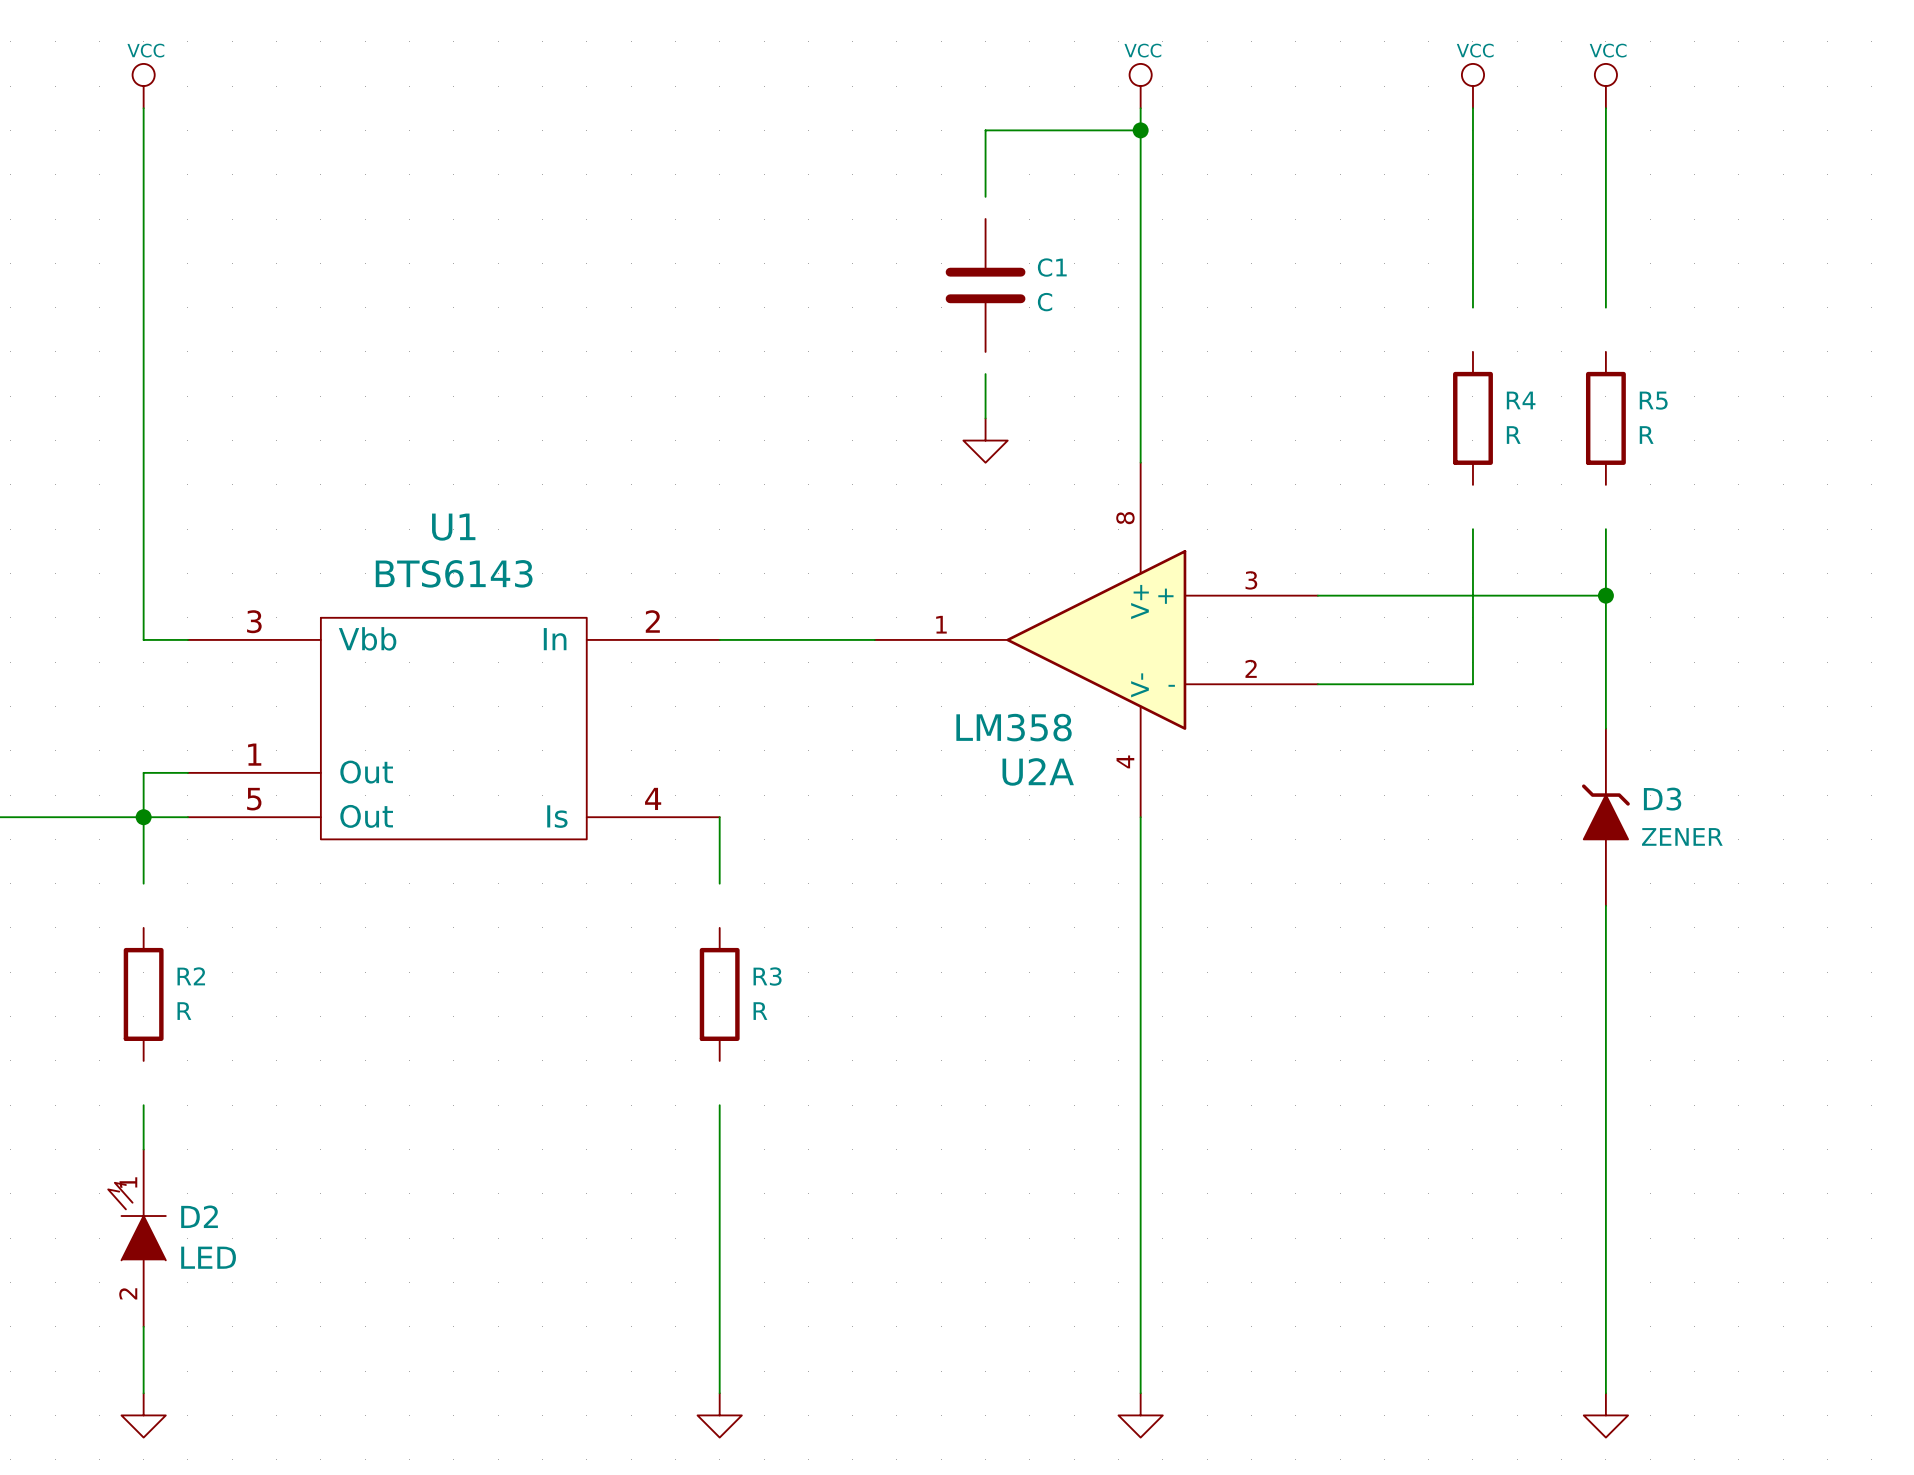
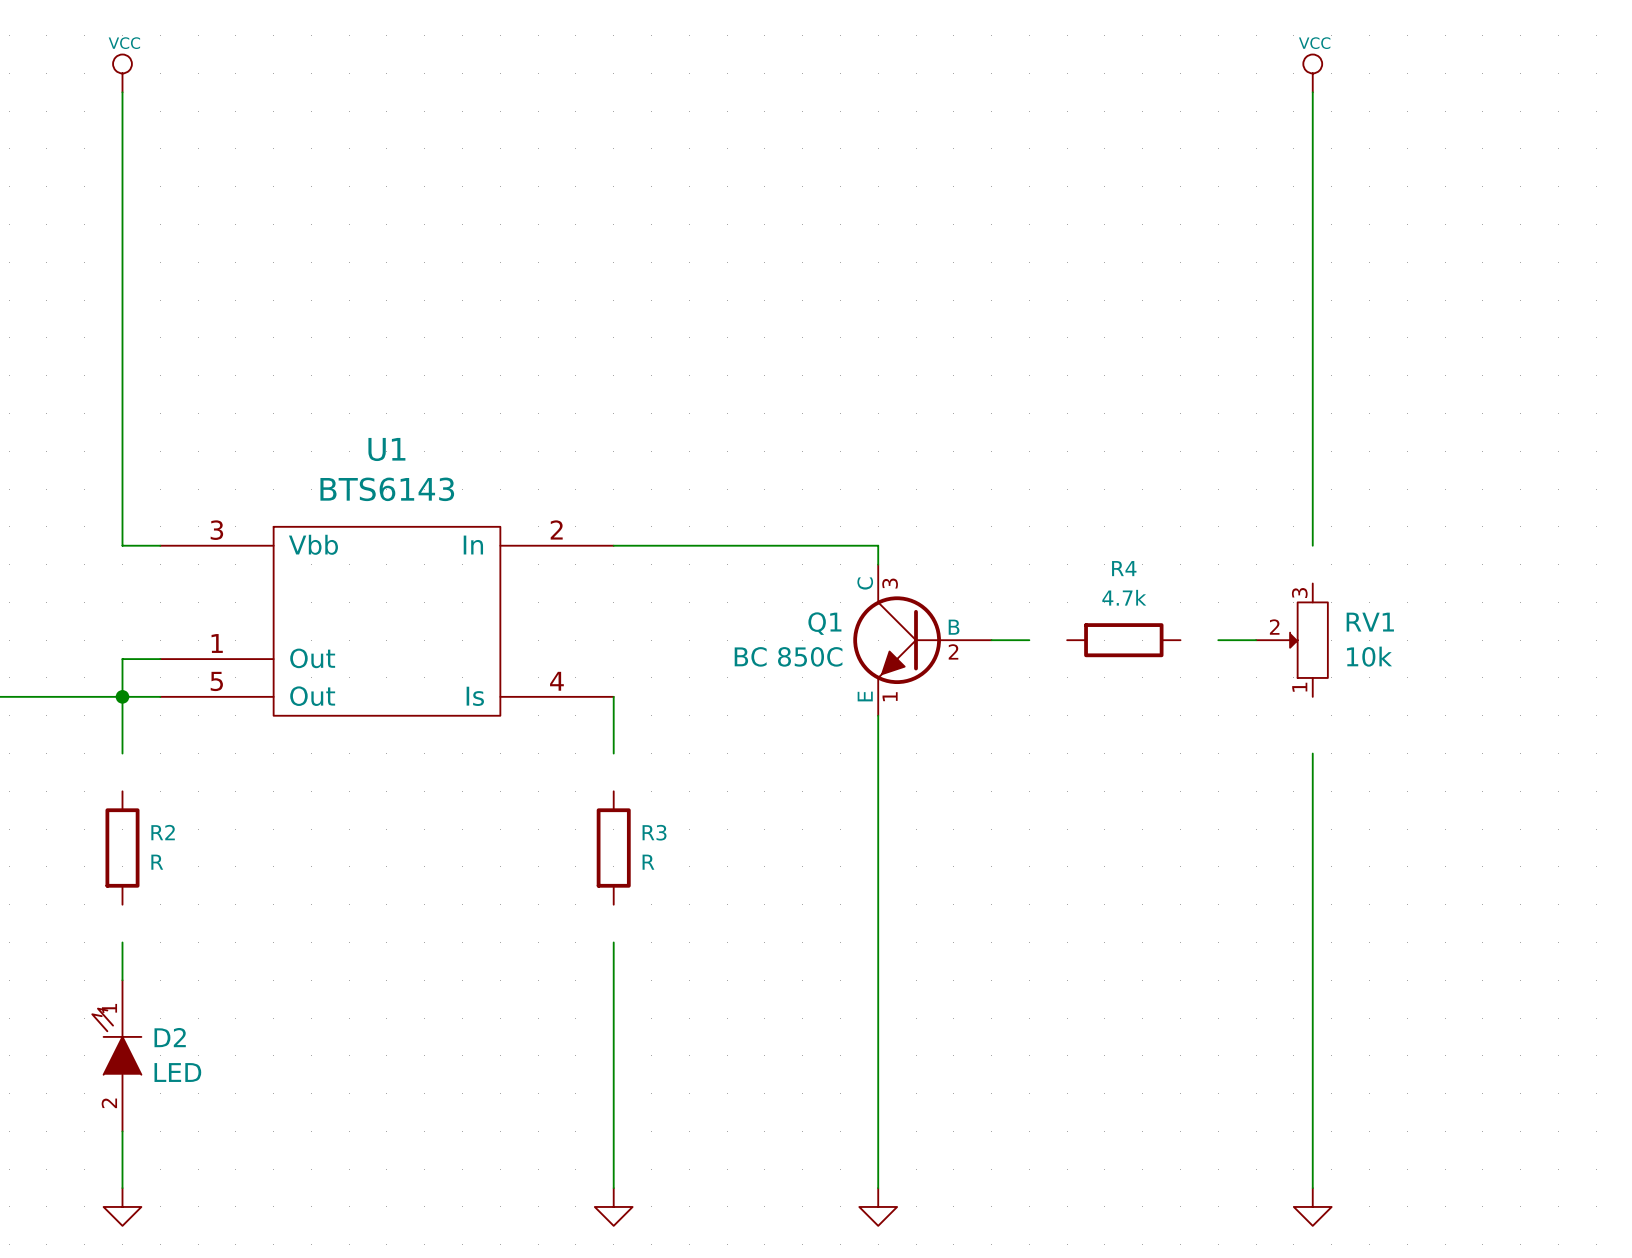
power symbol: VCC (1140, 86) -> none
power symbol: VCC (1472, 86) -> none
power symbol: none -> VCC (1312, 73)
power symbol: VCC (1605, 86) -> none
wire: (1140, 108) (1140, 462) -> none
wire: (1472, 108) (1472, 307) -> none
wire: none -> (1312, 92) (1312, 545)
wire: (1605, 108) (1605, 307) -> none
wire: (1140, 130) (985, 130) (985, 196) -> none
junction: (1140, 130) -> none
C1: C (985, 285) -> none
wire: (985, 374) (985, 418) -> none
R4 name position: R4 (1521, 400) -> R4 (1124, 568)
R4 rotation: 0° (1472, 418) -> 90° clockwise (1123, 640)
R4 position: (1472, 418) -> (1123, 640)
R5: R (1605, 418) -> none
R4 value: R (1513, 435) -> 4.7k (1124, 597)
power symbol: (985, 440) -> none
wire: (1472, 529) (1472, 684) (1317, 684) -> none
wire: (1605, 529) (1605, 728) -> none
wire: (1317, 595) (1605, 595) -> none
junction: (1605, 595) -> none
U2A: LM358 (1096, 639) -> none
Q1: none -> BC 850C (922, 640)
wire: none -> (991, 640) (1029, 640)
wire: none -> (1218, 640) (1256, 640)
RV1: none -> 10k (1291, 640)
wire: (1140, 817) (1140, 1393) -> none
D3: ZENER (1605, 817) -> none
wire: none -> (878, 715) (878, 1188)
wire: none -> (1312, 753) (1312, 1188)
wire: (1605, 905) (1605, 1393) -> none
power symbol position: (1140, 1415) -> (878, 1206)
power symbol position: (1605, 1415) -> (1312, 1206)

